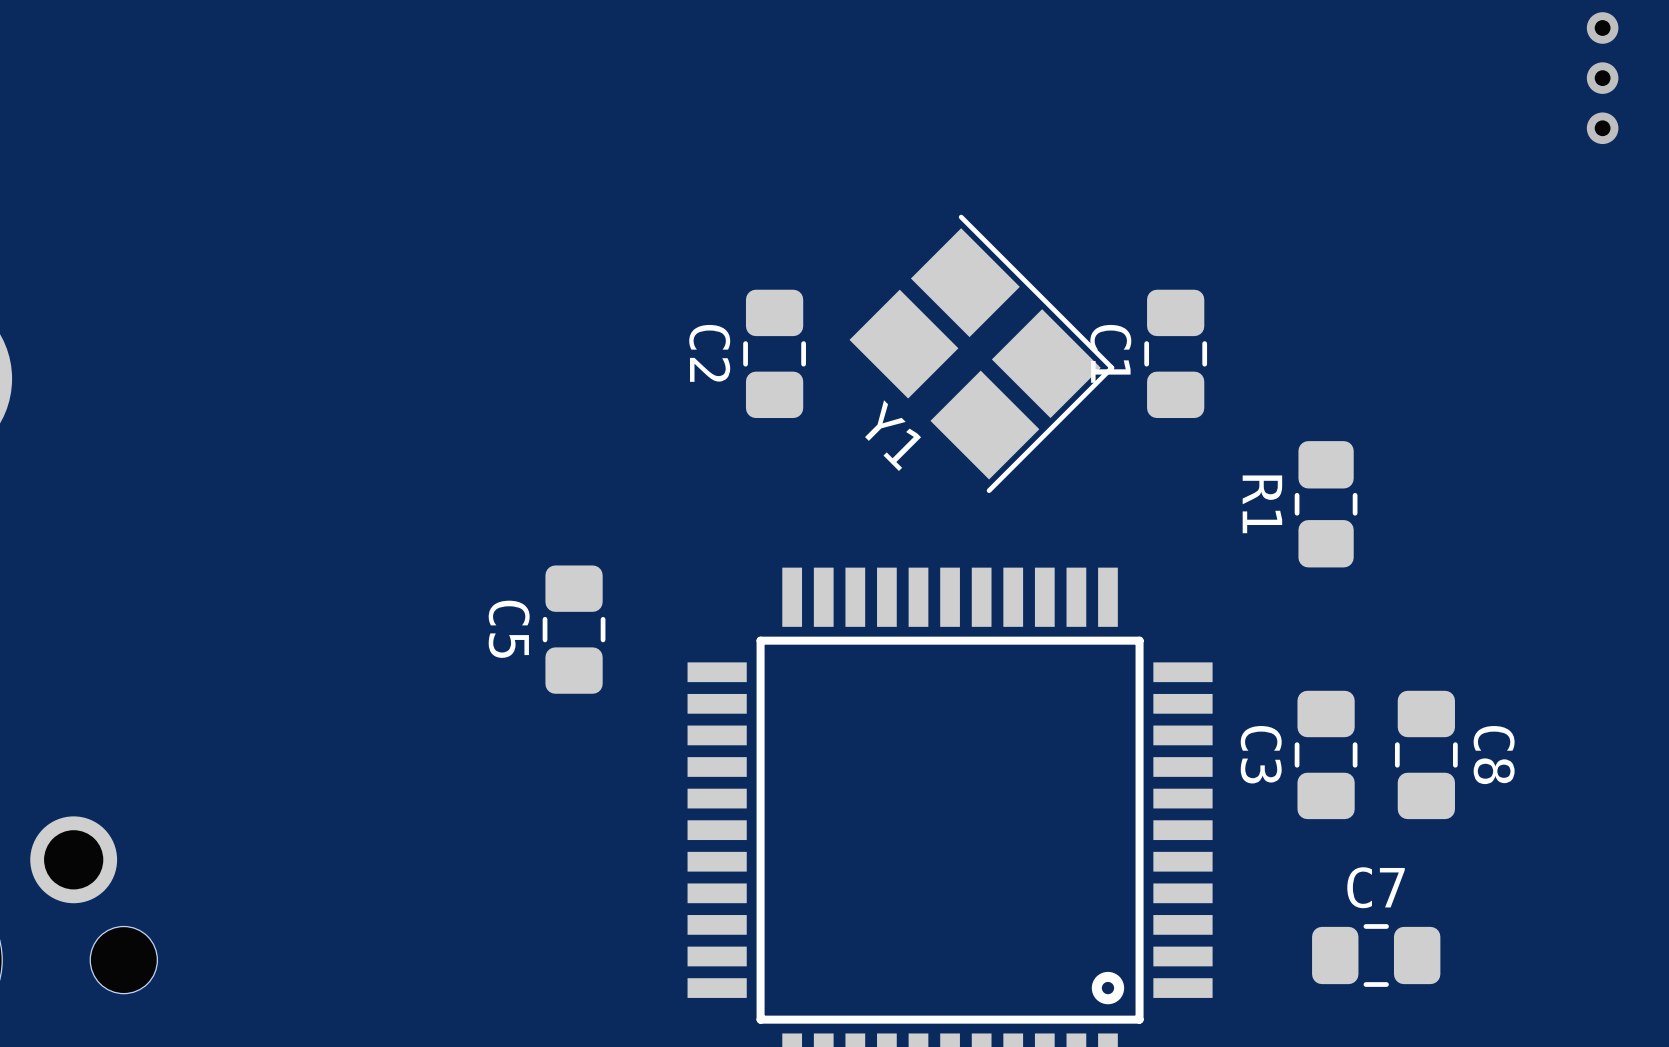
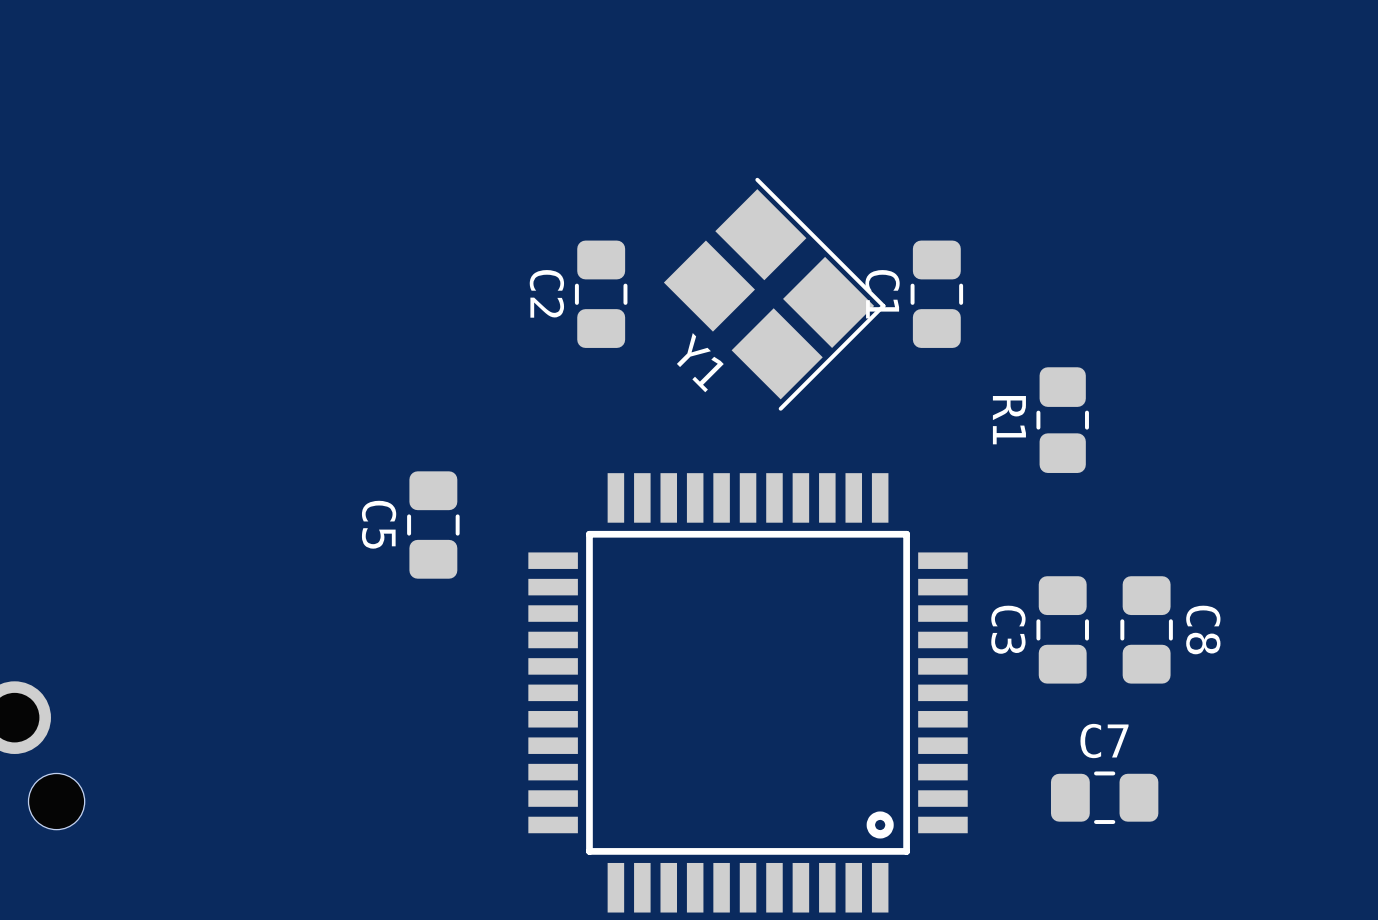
via: (1602, 27) -> none
via: (1602, 78) -> none
via: (1602, 128) -> none

